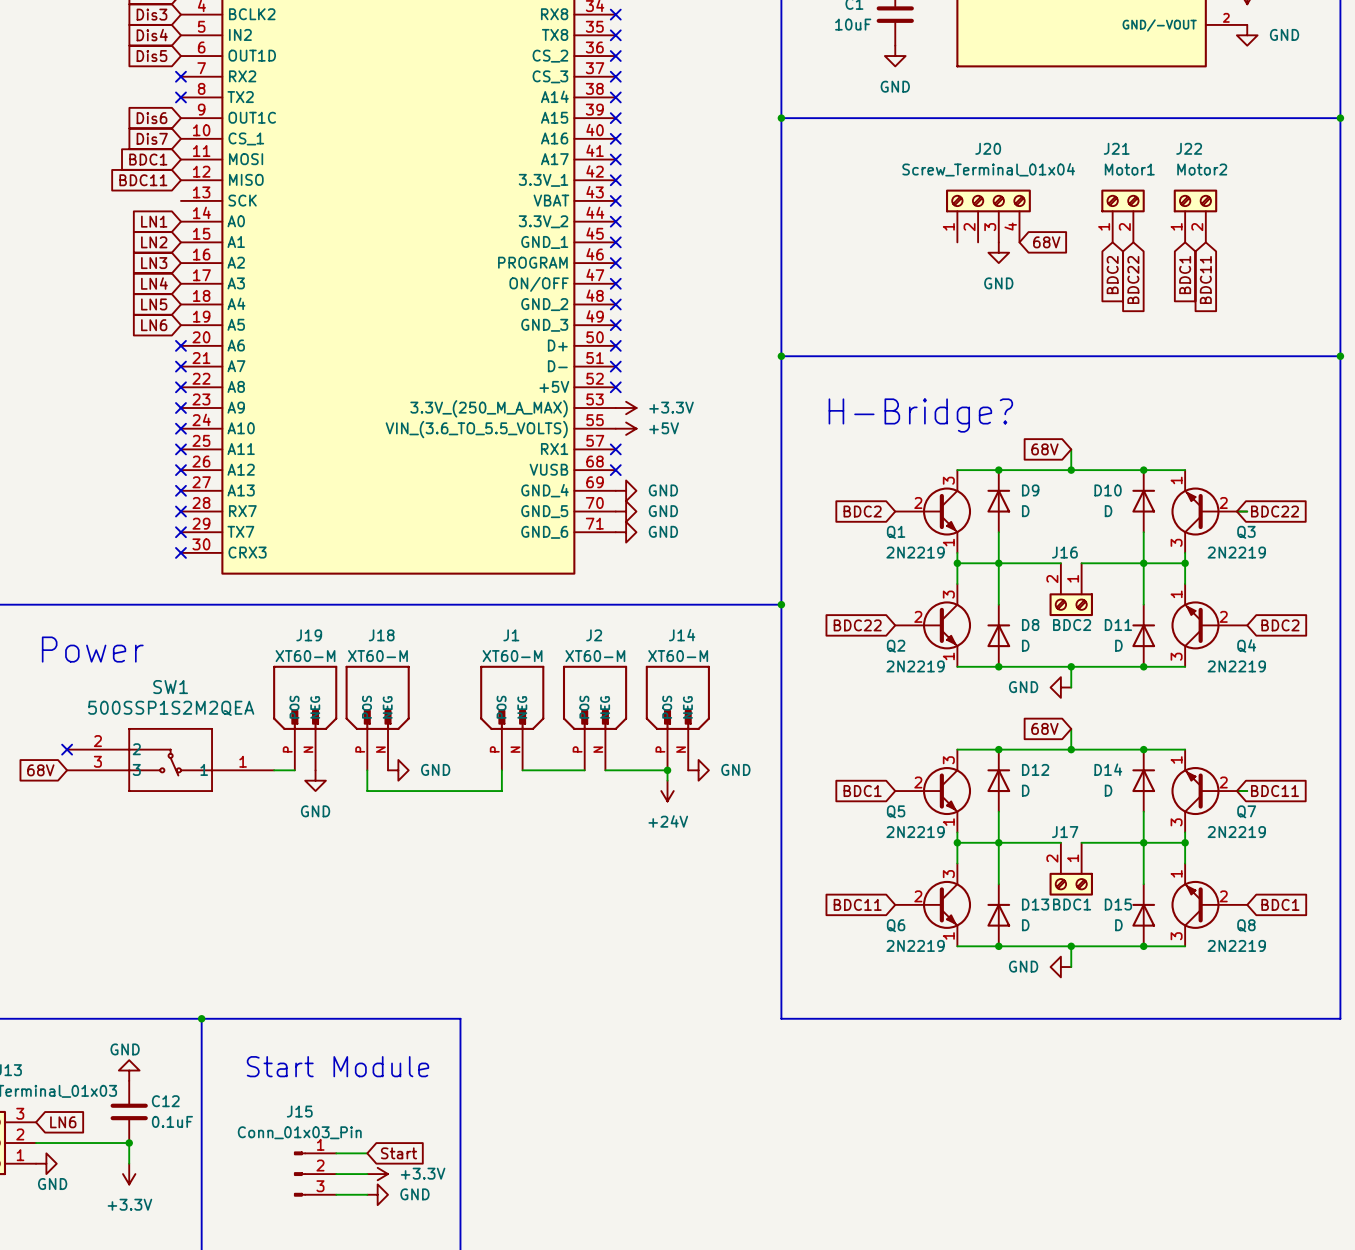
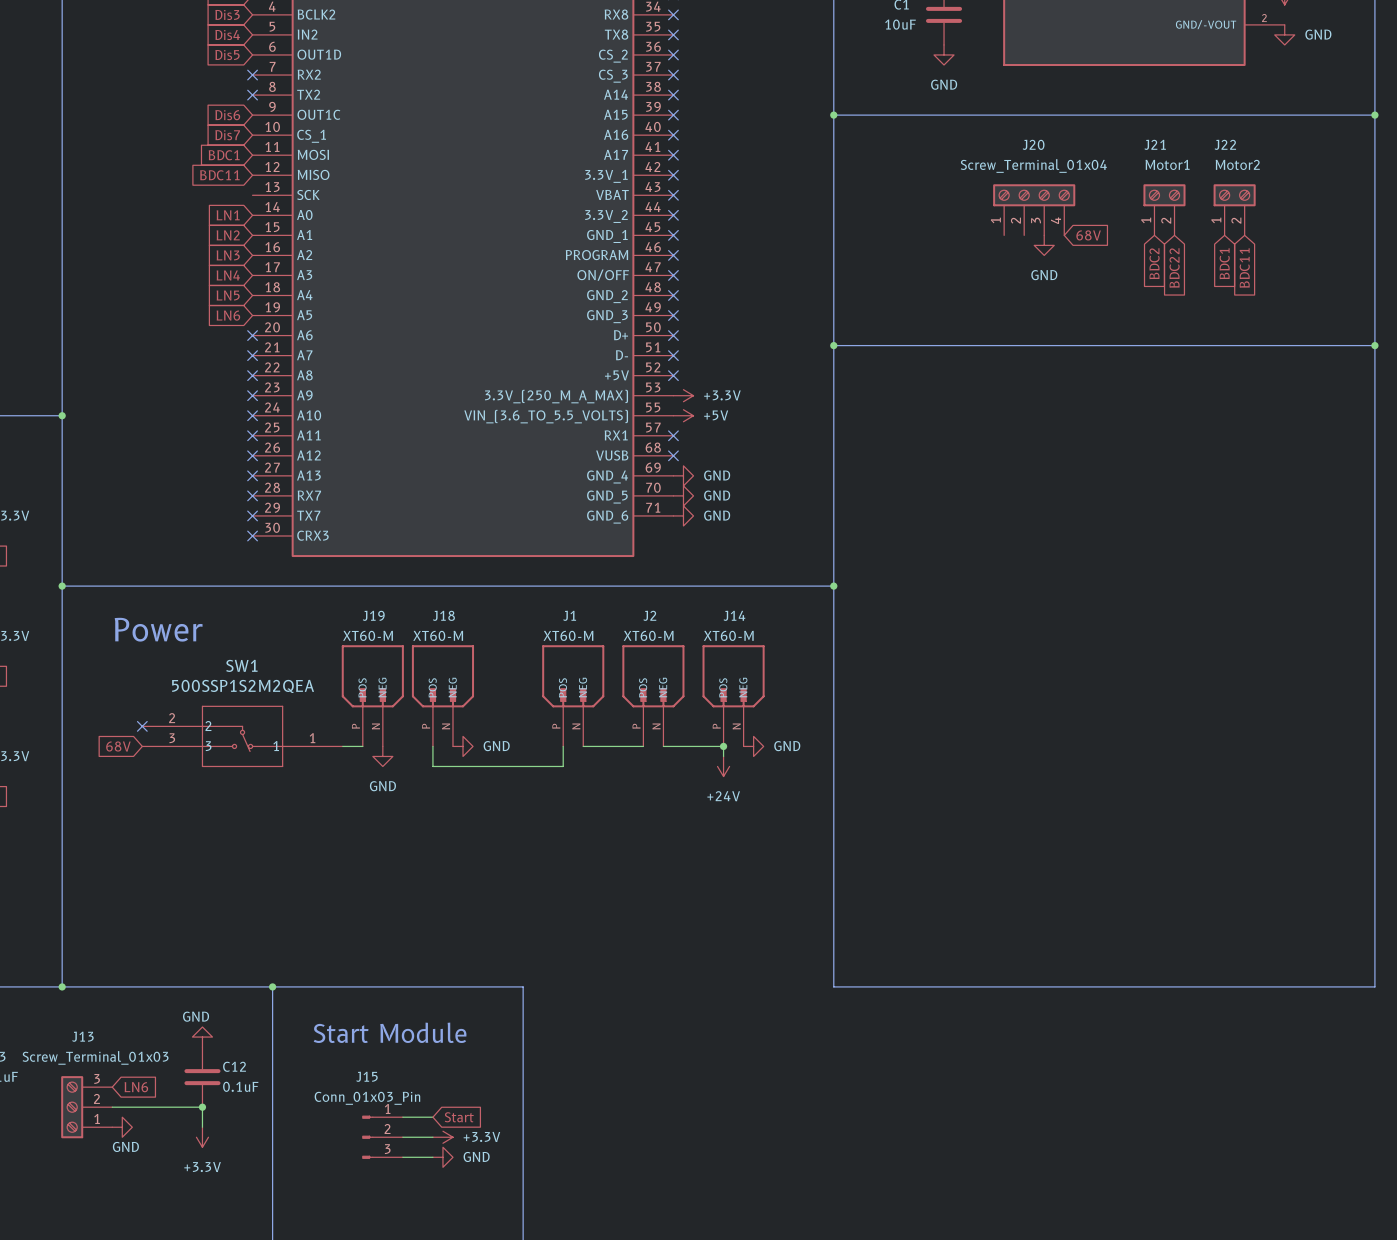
text: H-Bridge? (920, 415) -> none
global label: 68V (1044, 449) -> none
wire: (1071, 449) (1071, 470) -> none
wire: (957, 470) (1185, 470) -> none
junction: (998, 470) -> none
junction: (1071, 470) -> none
junction: (1143, 470) -> none
D9: D (998, 501) -> none
D10: D (1143, 501) -> none
global label: BDC2 (862, 511) -> none
Q1: 2N2219 (933, 511) -> none
Q3: 2N2219 (1209, 511) -> none
wire: (1236, 511) (1247, 511) -> none
global label: BDC22 (1274, 511) -> none
wire: (998, 532) (998, 604) -> none
wire: (1143, 532) (1143, 604) -> none
wire: (957, 552) (957, 583) -> none
wire: (1185, 552) (1185, 583) -> none
wire: (957, 563) (1060, 563) -> none
junction: (957, 563) -> none
junction: (998, 563) -> none
wire: (1081, 563) (1185, 563) -> none
junction: (1143, 563) -> none
junction: (1185, 563) -> none
J16: BDC2 (1071, 589) -> none
global label: BDC22 (857, 625) -> none
Q2: 2N2219 (933, 625) -> none
Q4: 2N2219 (1209, 625) -> none
global label: BDC2 (1280, 625) -> none
D8: D (998, 635) -> none
D11: D (1143, 635) -> none
wire: (957, 666) (1185, 666) -> none
junction: (998, 666) -> none
wire: (1071, 666) (1071, 687) -> none
junction: (1071, 666) -> none
junction: (1143, 666) -> none
power symbol: GND (1060, 687) -> none
global label: 68V (1044, 728) -> none
wire: (1071, 728) (1071, 749) -> none
wire: (957, 749) (1185, 749) -> none
junction: (998, 749) -> none
junction: (1071, 749) -> none
junction: (1143, 749) -> none
D12: D (998, 780) -> none
D14: D (1143, 780) -> none
global label: BDC1 (862, 791) -> none
Q5: 2N2219 (933, 791) -> none
Q7: 2N2219 (1209, 791) -> none
wire: (1236, 791) (1247, 791) -> none
global label: BDC11 (1274, 791) -> none
wire: (998, 811) (998, 884) -> none
wire: (1143, 811) (1143, 884) -> none
wire: (957, 832) (957, 863) -> none
wire: (1185, 832) (1185, 863) -> none
wire: (957, 842) (1060, 842) -> none
junction: (957, 842) -> none
junction: (998, 842) -> none
wire: (1081, 842) (1185, 842) -> none
junction: (1143, 842) -> none
junction: (1185, 842) -> none
J17: BDC1 (1071, 869) -> none
global label: BDC11 (857, 904) -> none
Q6: 2N2219 (933, 904) -> none
Q8: 2N2219 (1209, 904) -> none
global label: BDC1 (1280, 904) -> none
D13: D (998, 915) -> none
D15: D (1143, 915) -> none
wire: (957, 946) (1185, 946) -> none
junction: (998, 946) -> none
wire: (1071, 946) (1071, 967) -> none
junction: (1071, 946) -> none
junction: (1143, 946) -> none
power symbol: GND (1060, 967) -> none

